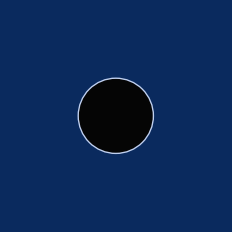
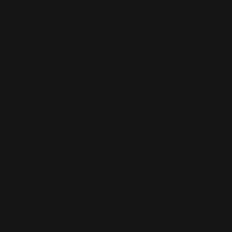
part: (115, 115) -> none

